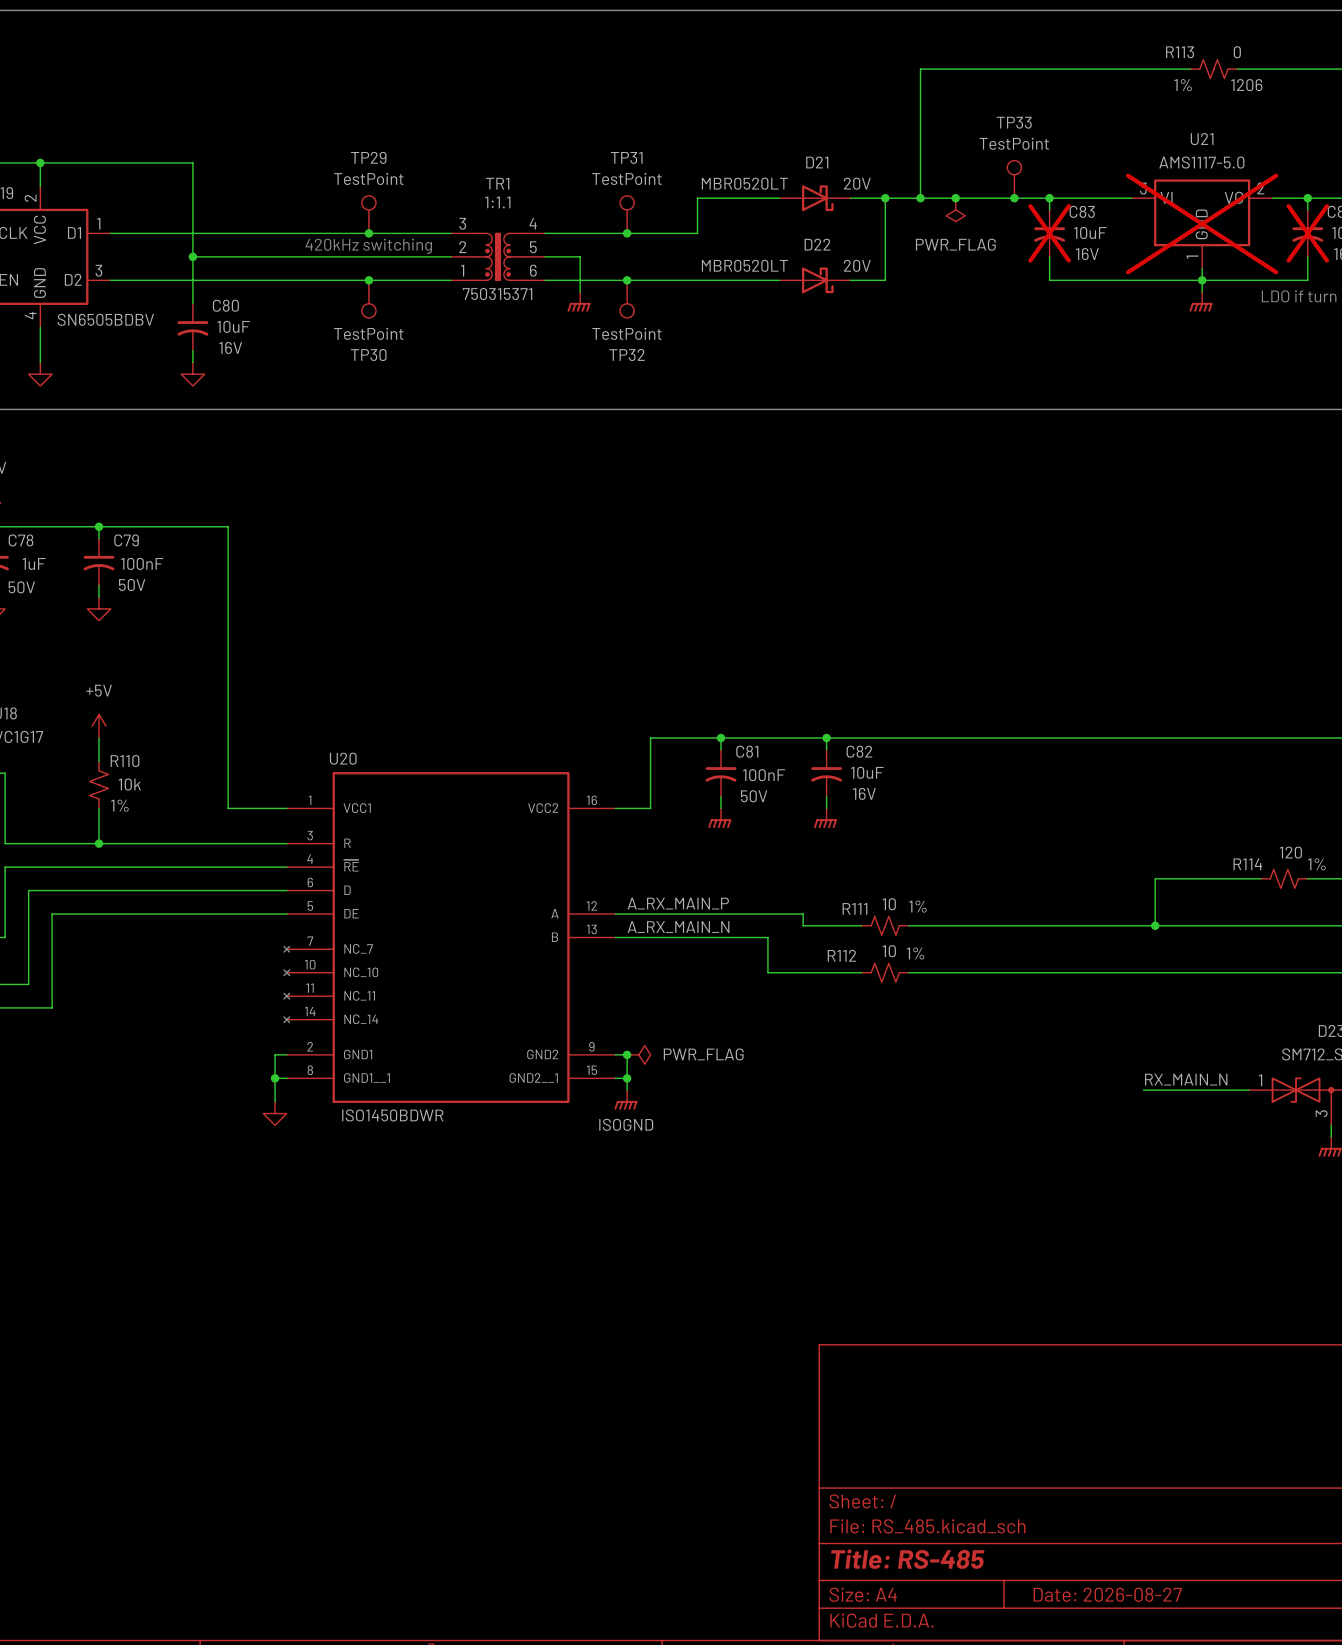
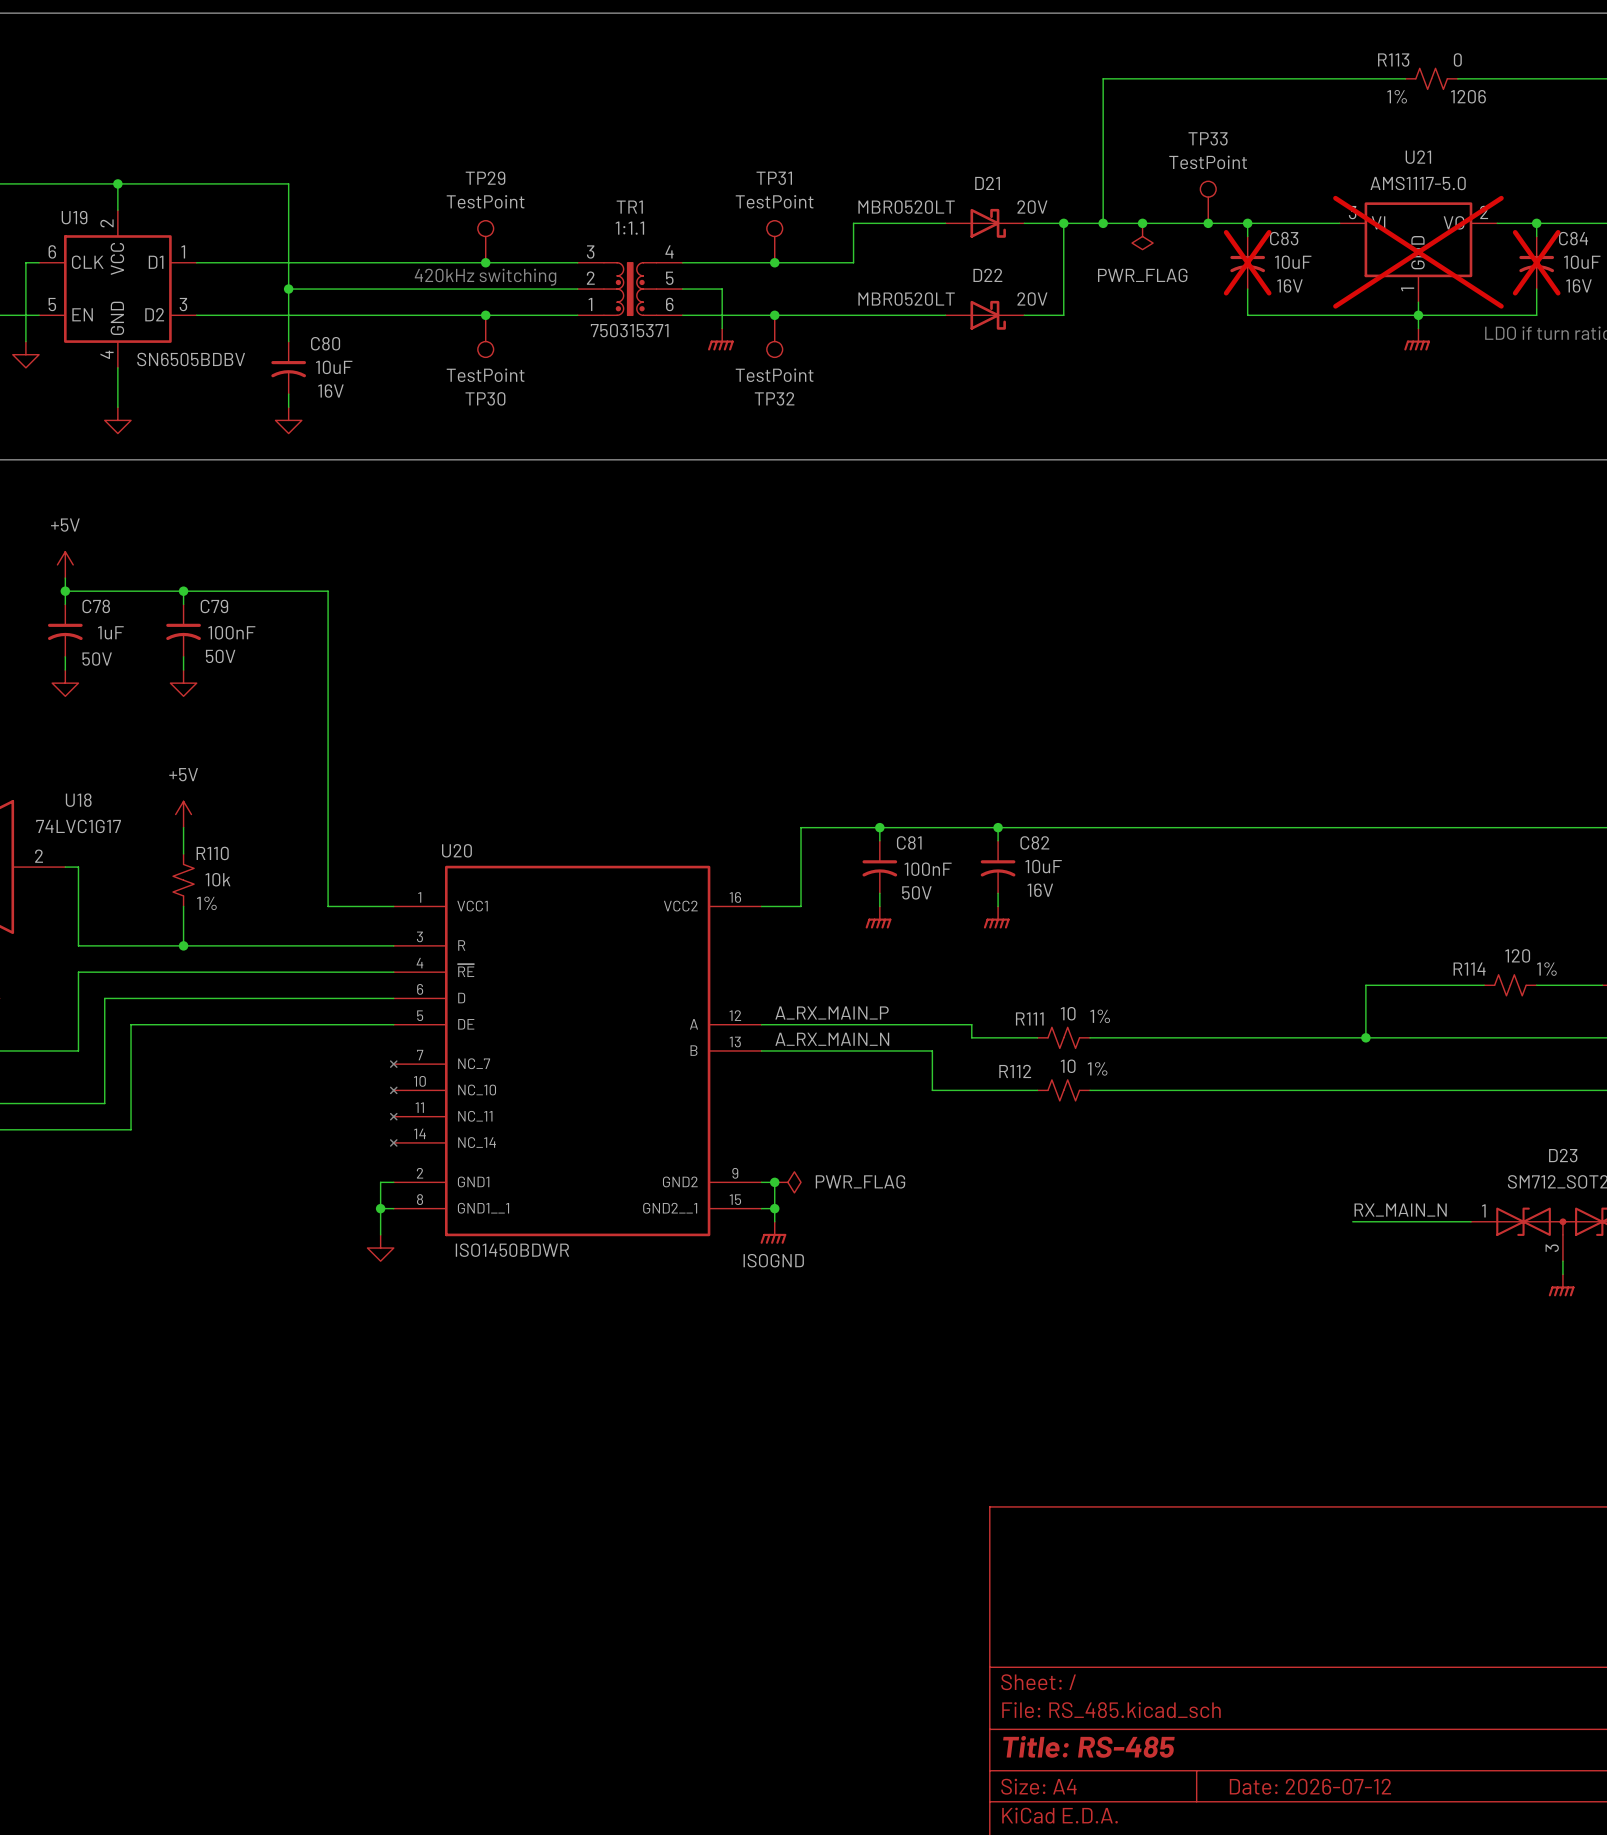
title block: Date: 2026-08-27 (1107, 1594) -> Date: 2026-07-12 (1310, 1786)

